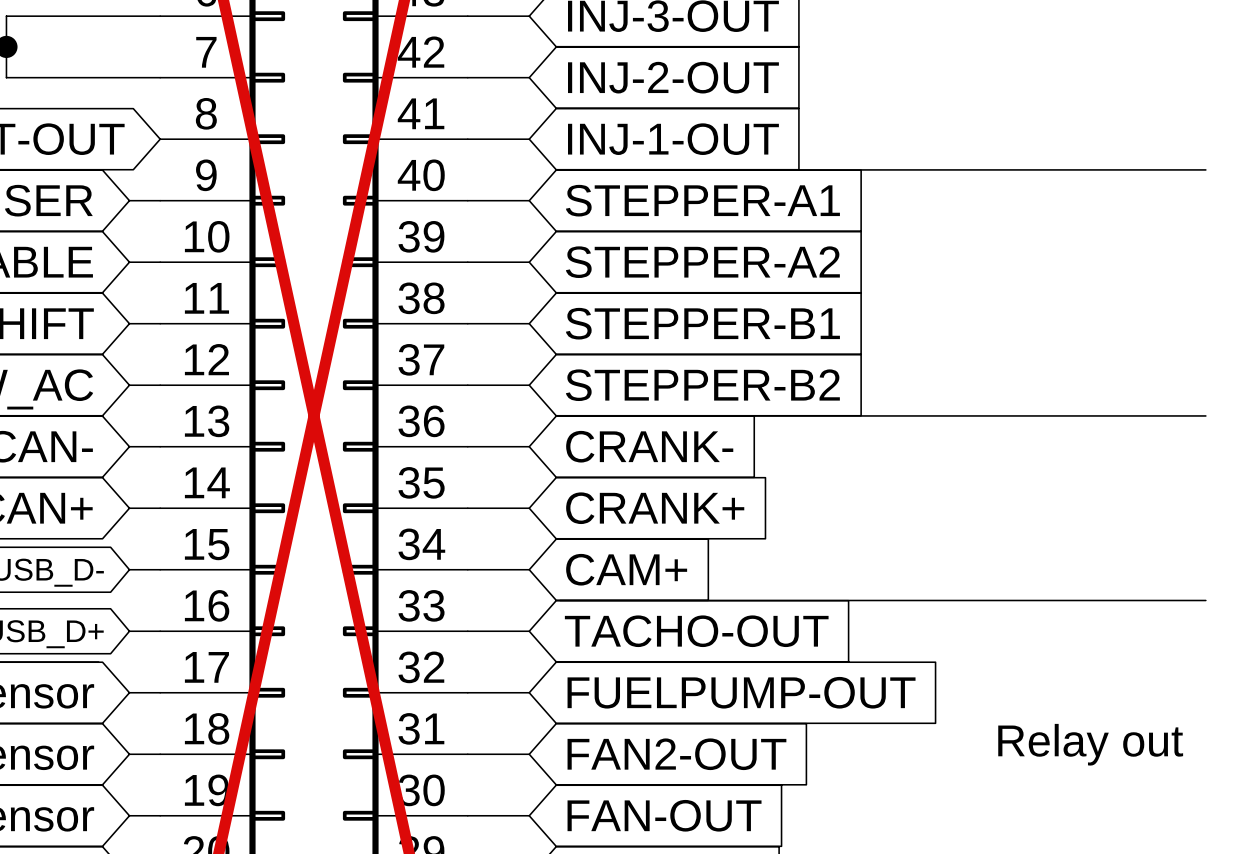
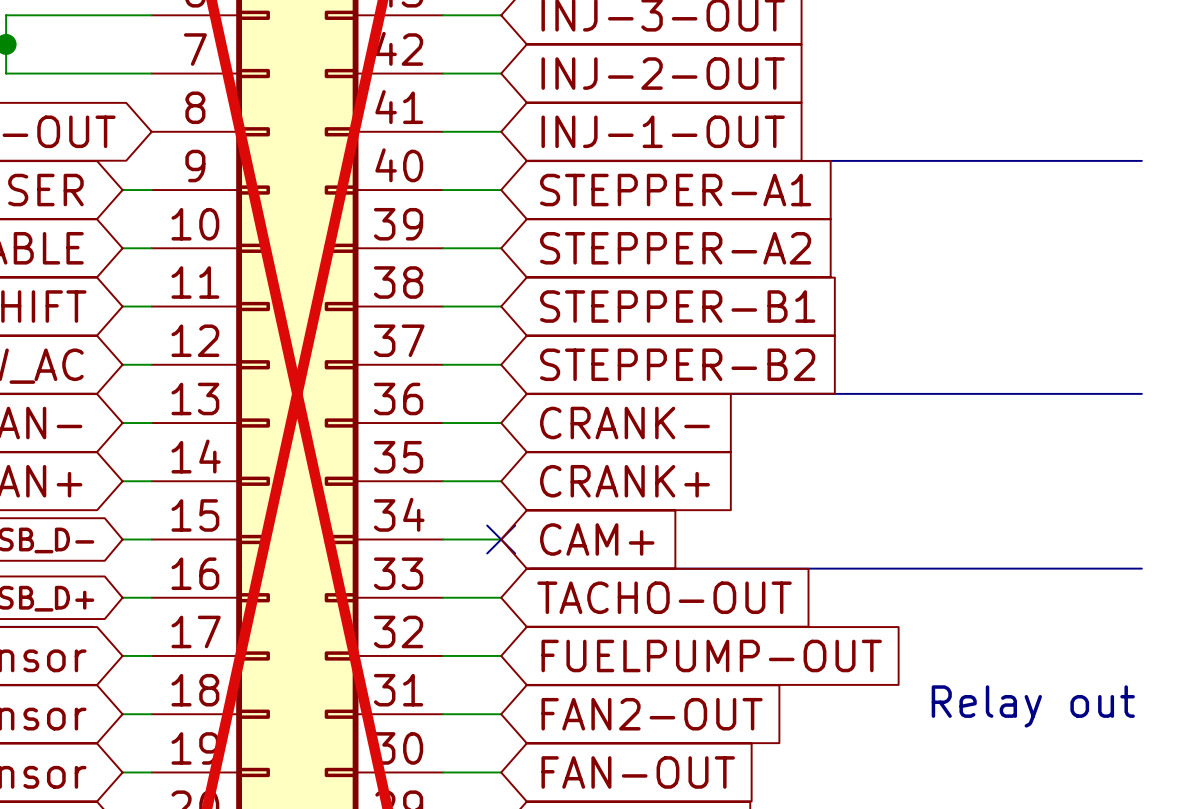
no-connect mark: none -> (501, 539)

